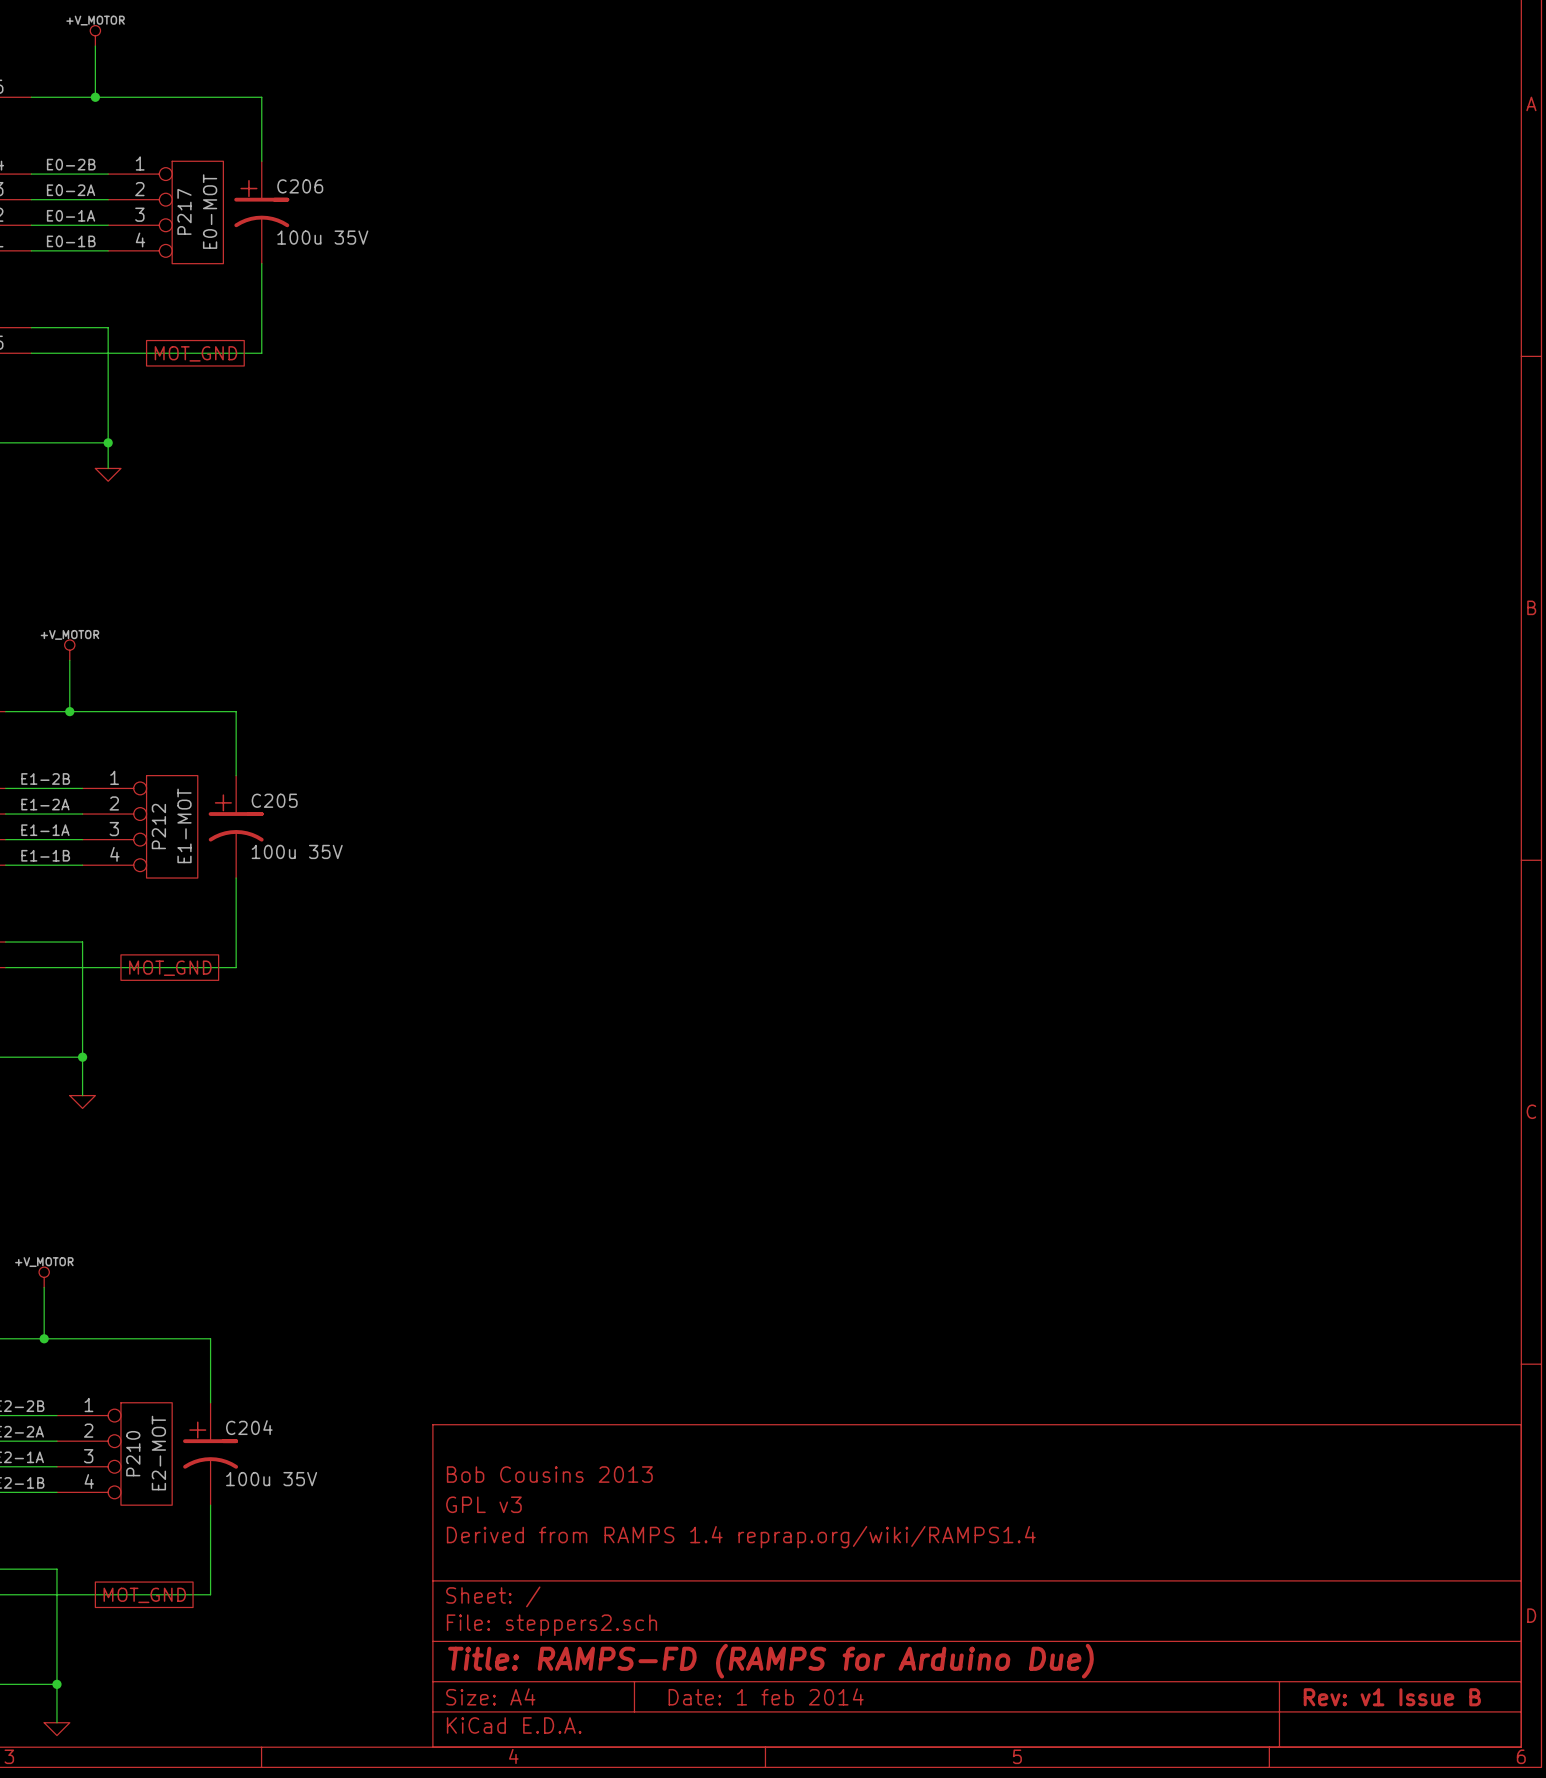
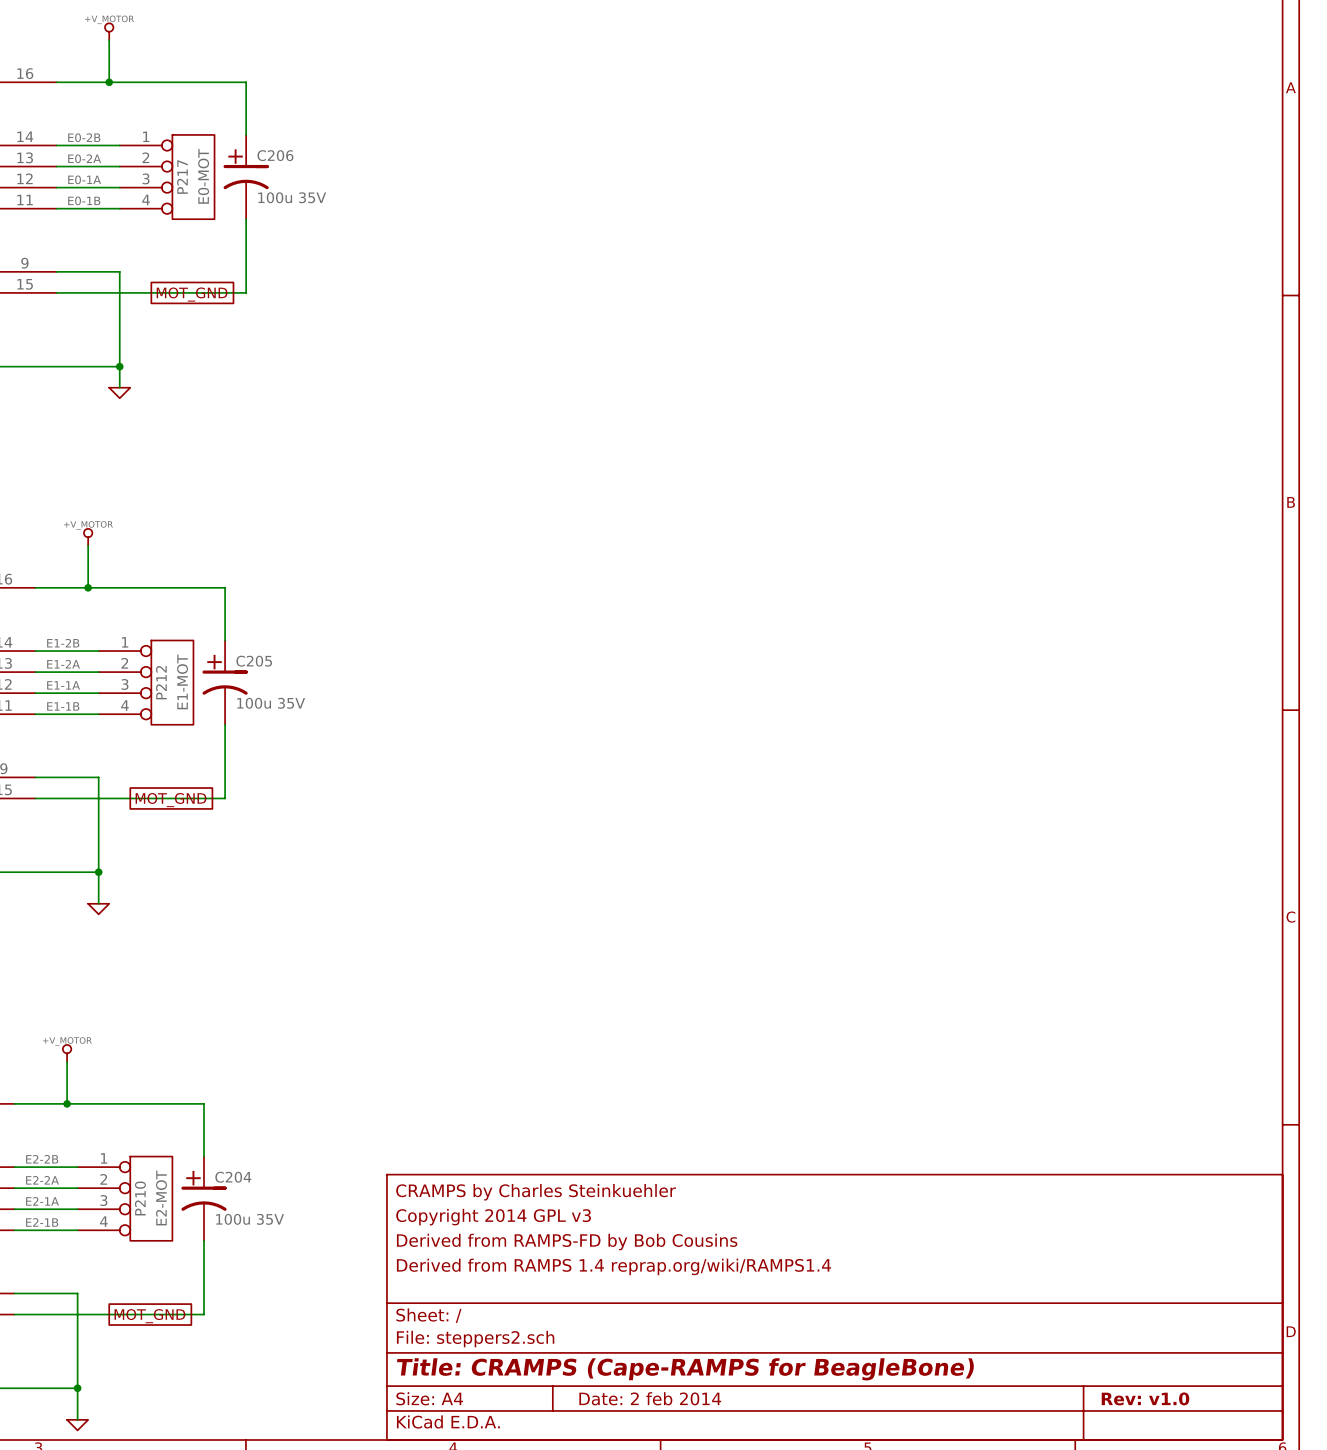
title block: none -> CRAMPS by Charles Steinkuehler (536, 1192)
title block: Bob Cousins 2013 (549, 1474) -> Copyright 2014 GPL v3 (493, 1217)
title block: GPL v3 (483, 1504) -> Derived from RAMPS-FD by Bob Cousins (567, 1242)
title block: Title: RAMPS-FD (RAMPS for Arduino Due) (770, 1661) -> Title: CRAMPS (Cape-RAMPS for BeagleBone) (685, 1369)
title block: Date: 1 feb 2014 (766, 1696) -> Date: 2 feb 2014 (650, 1398)
title block: Rev: v1 Issue B (1392, 1697) -> Rev: v1.0 (1145, 1398)

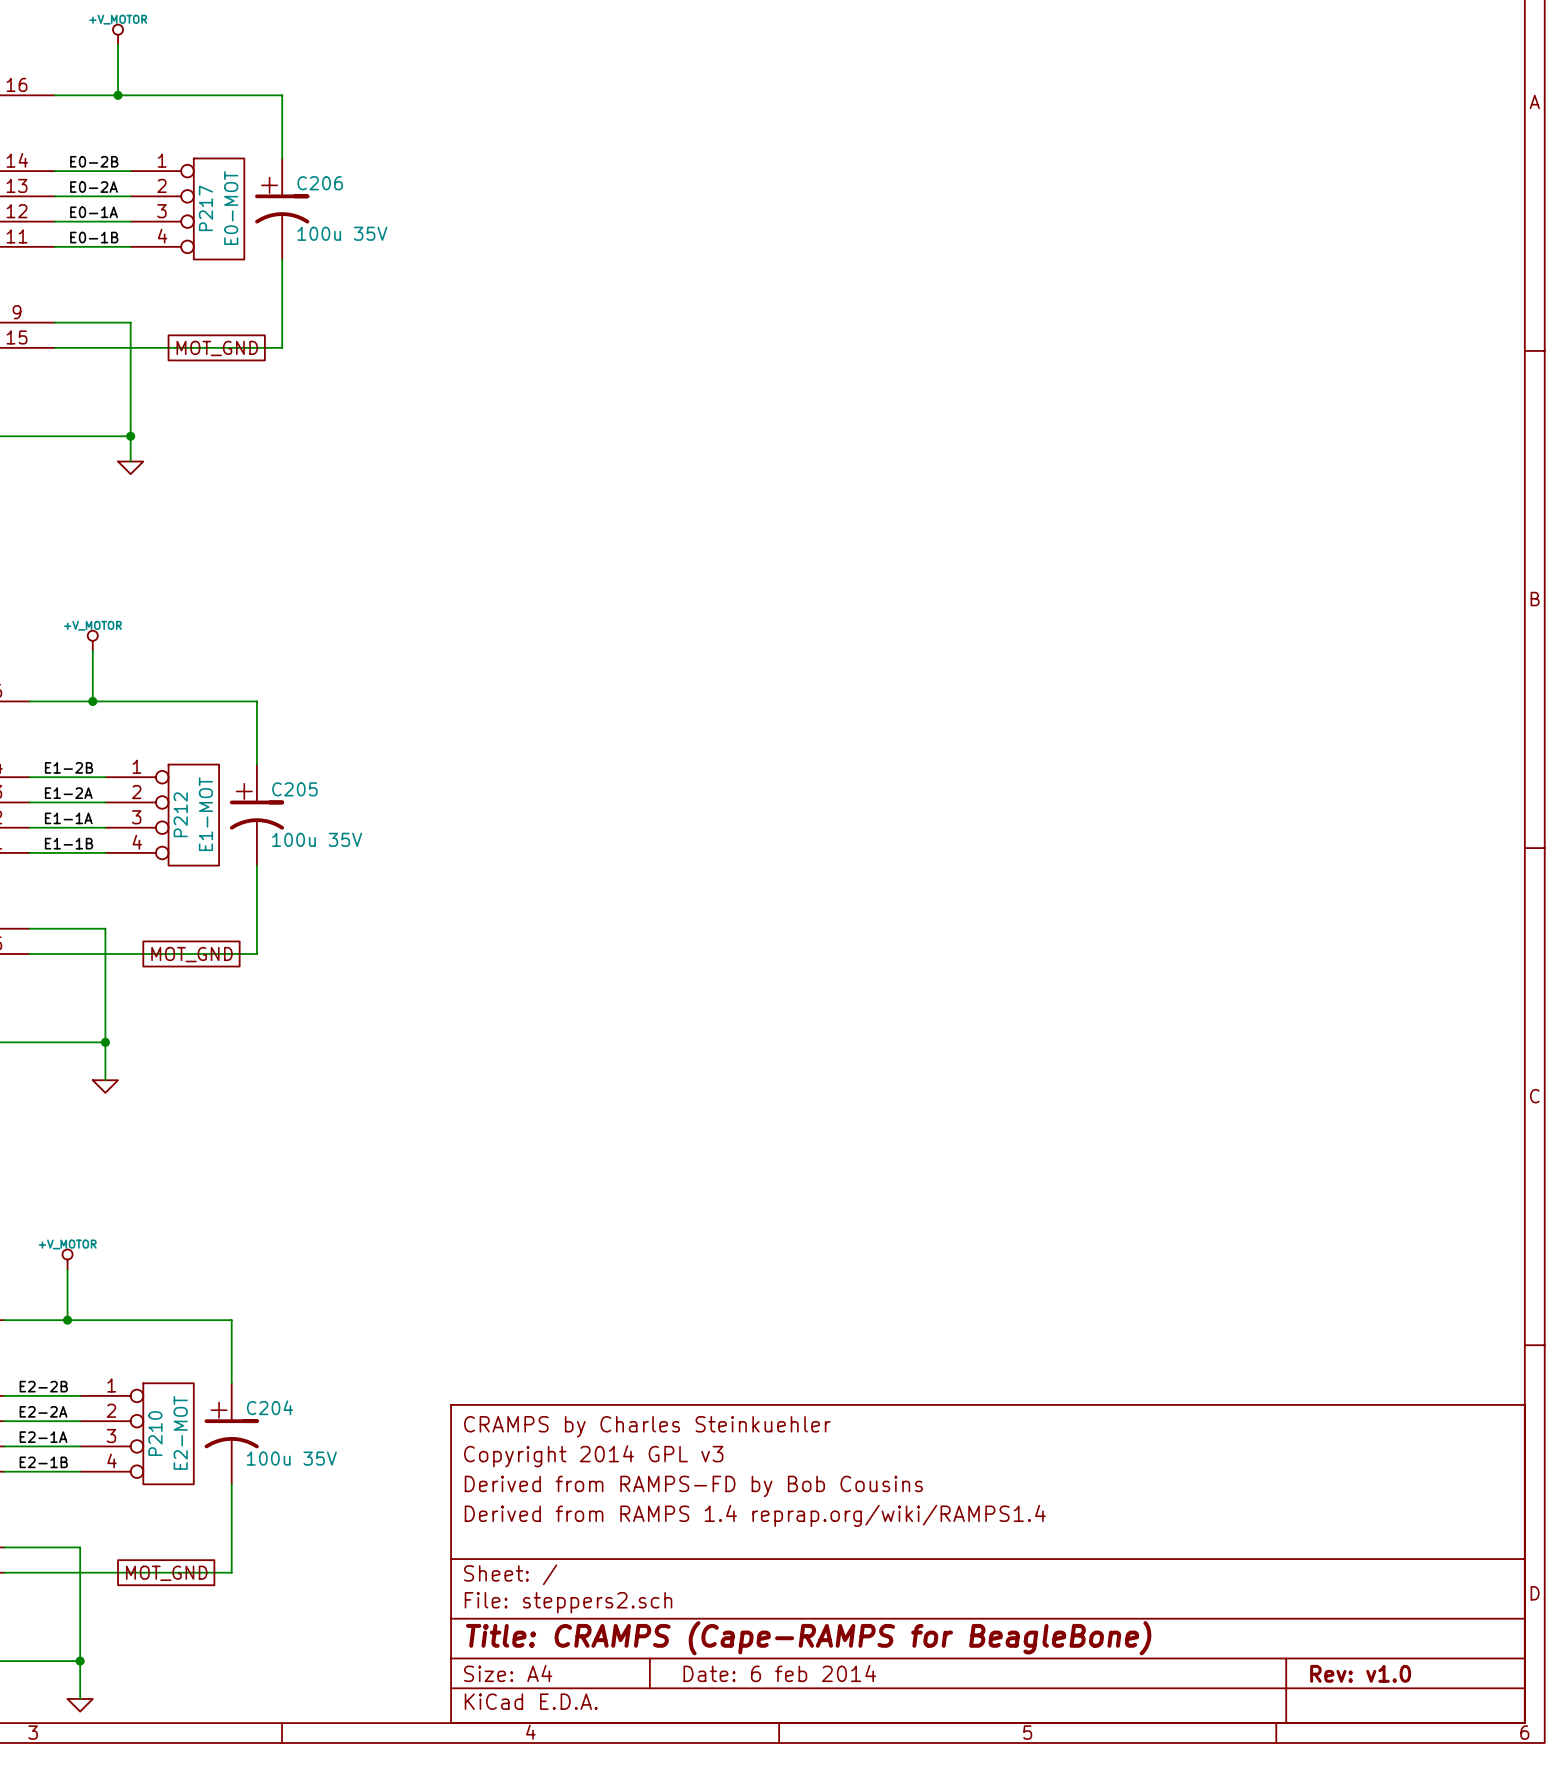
title block: Date: 2 feb 2014 (650, 1398) -> Date: 6 feb 2014 (779, 1673)

